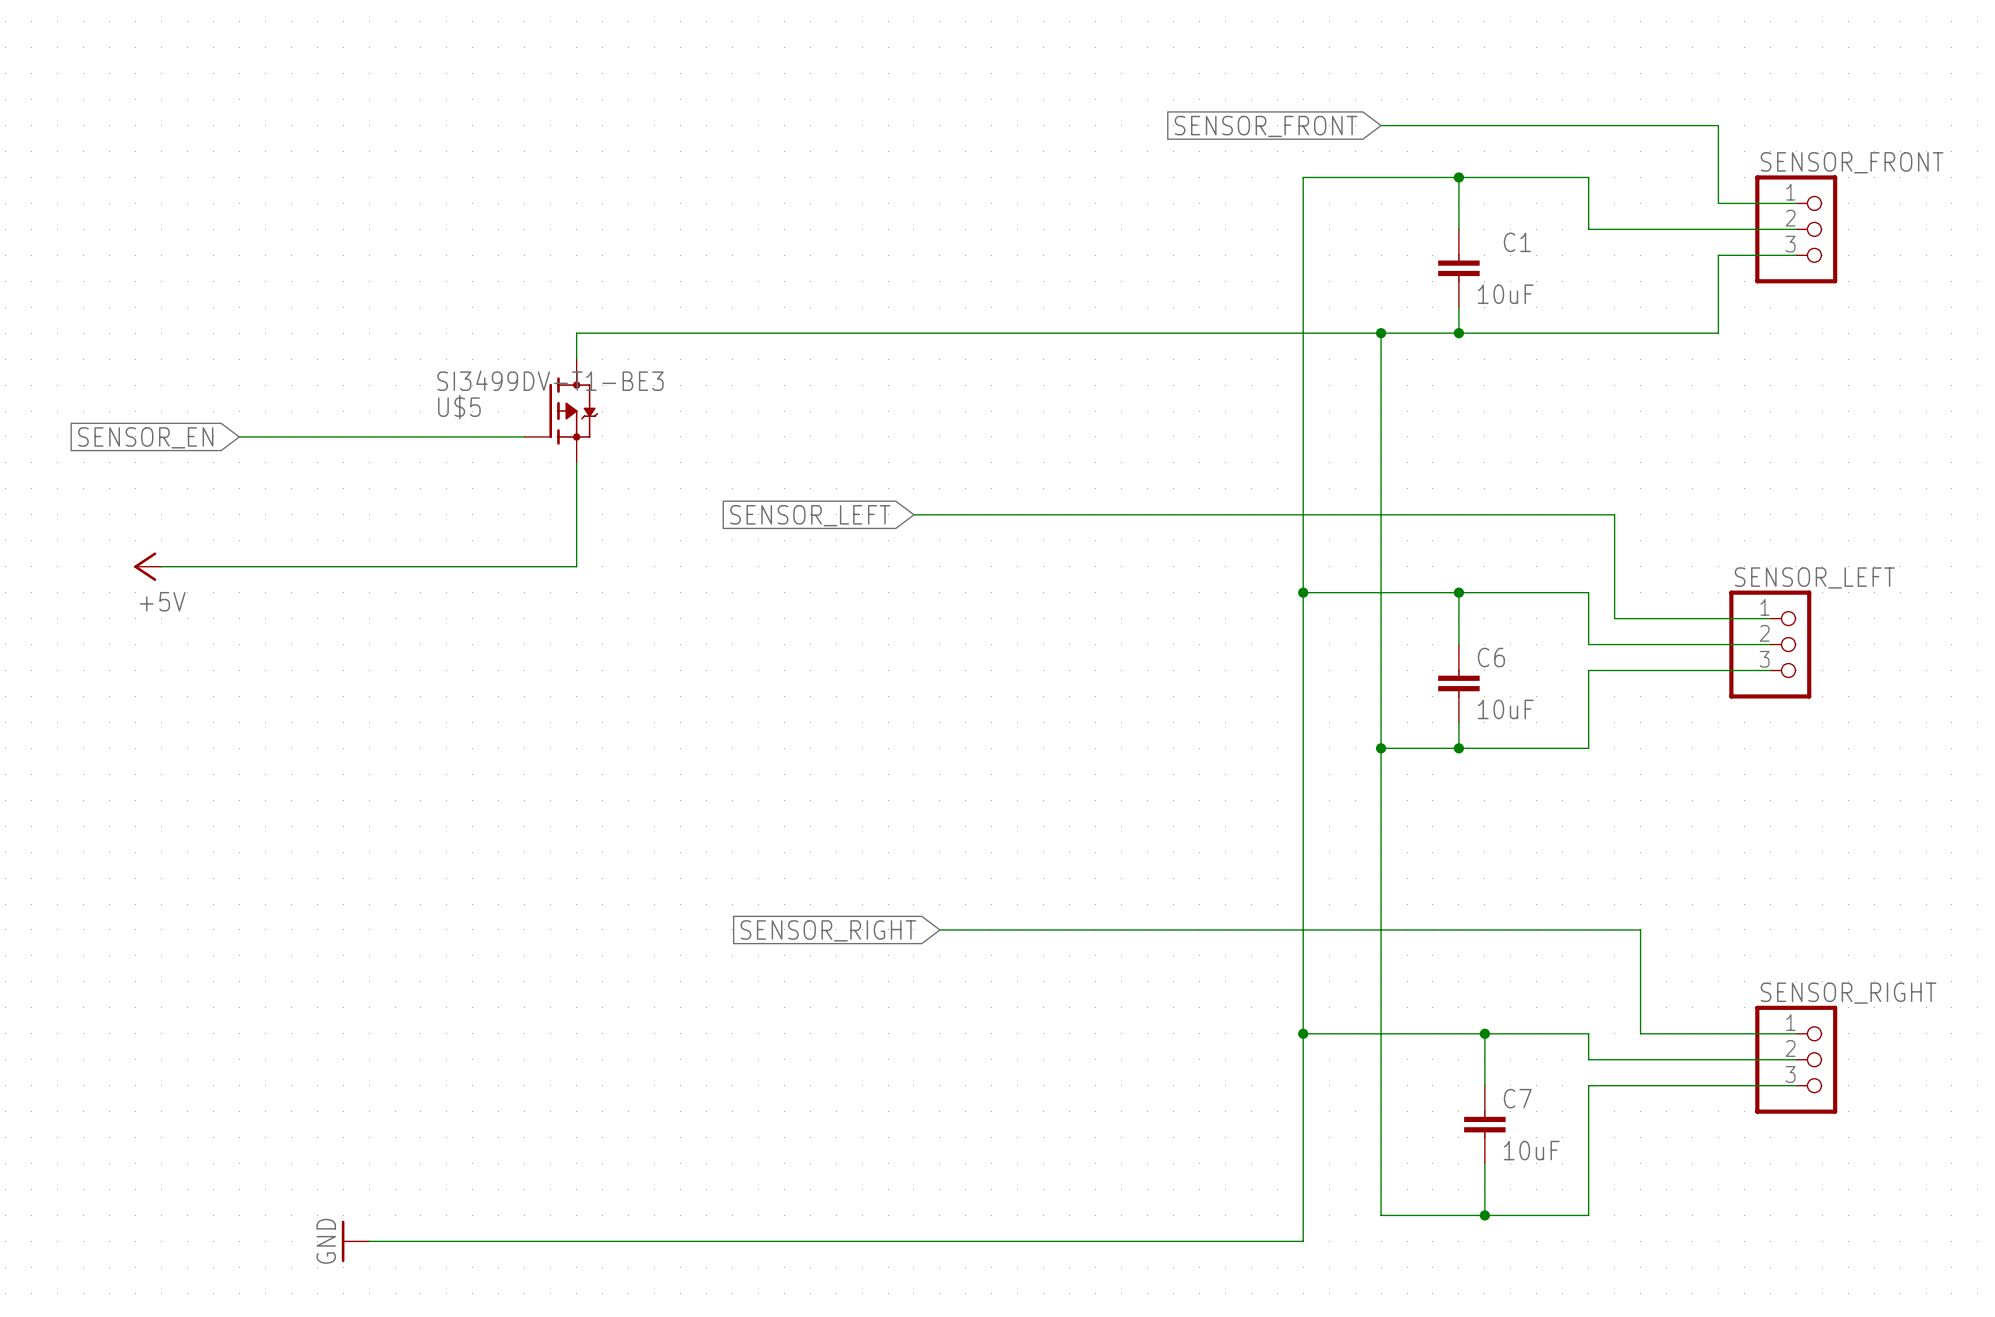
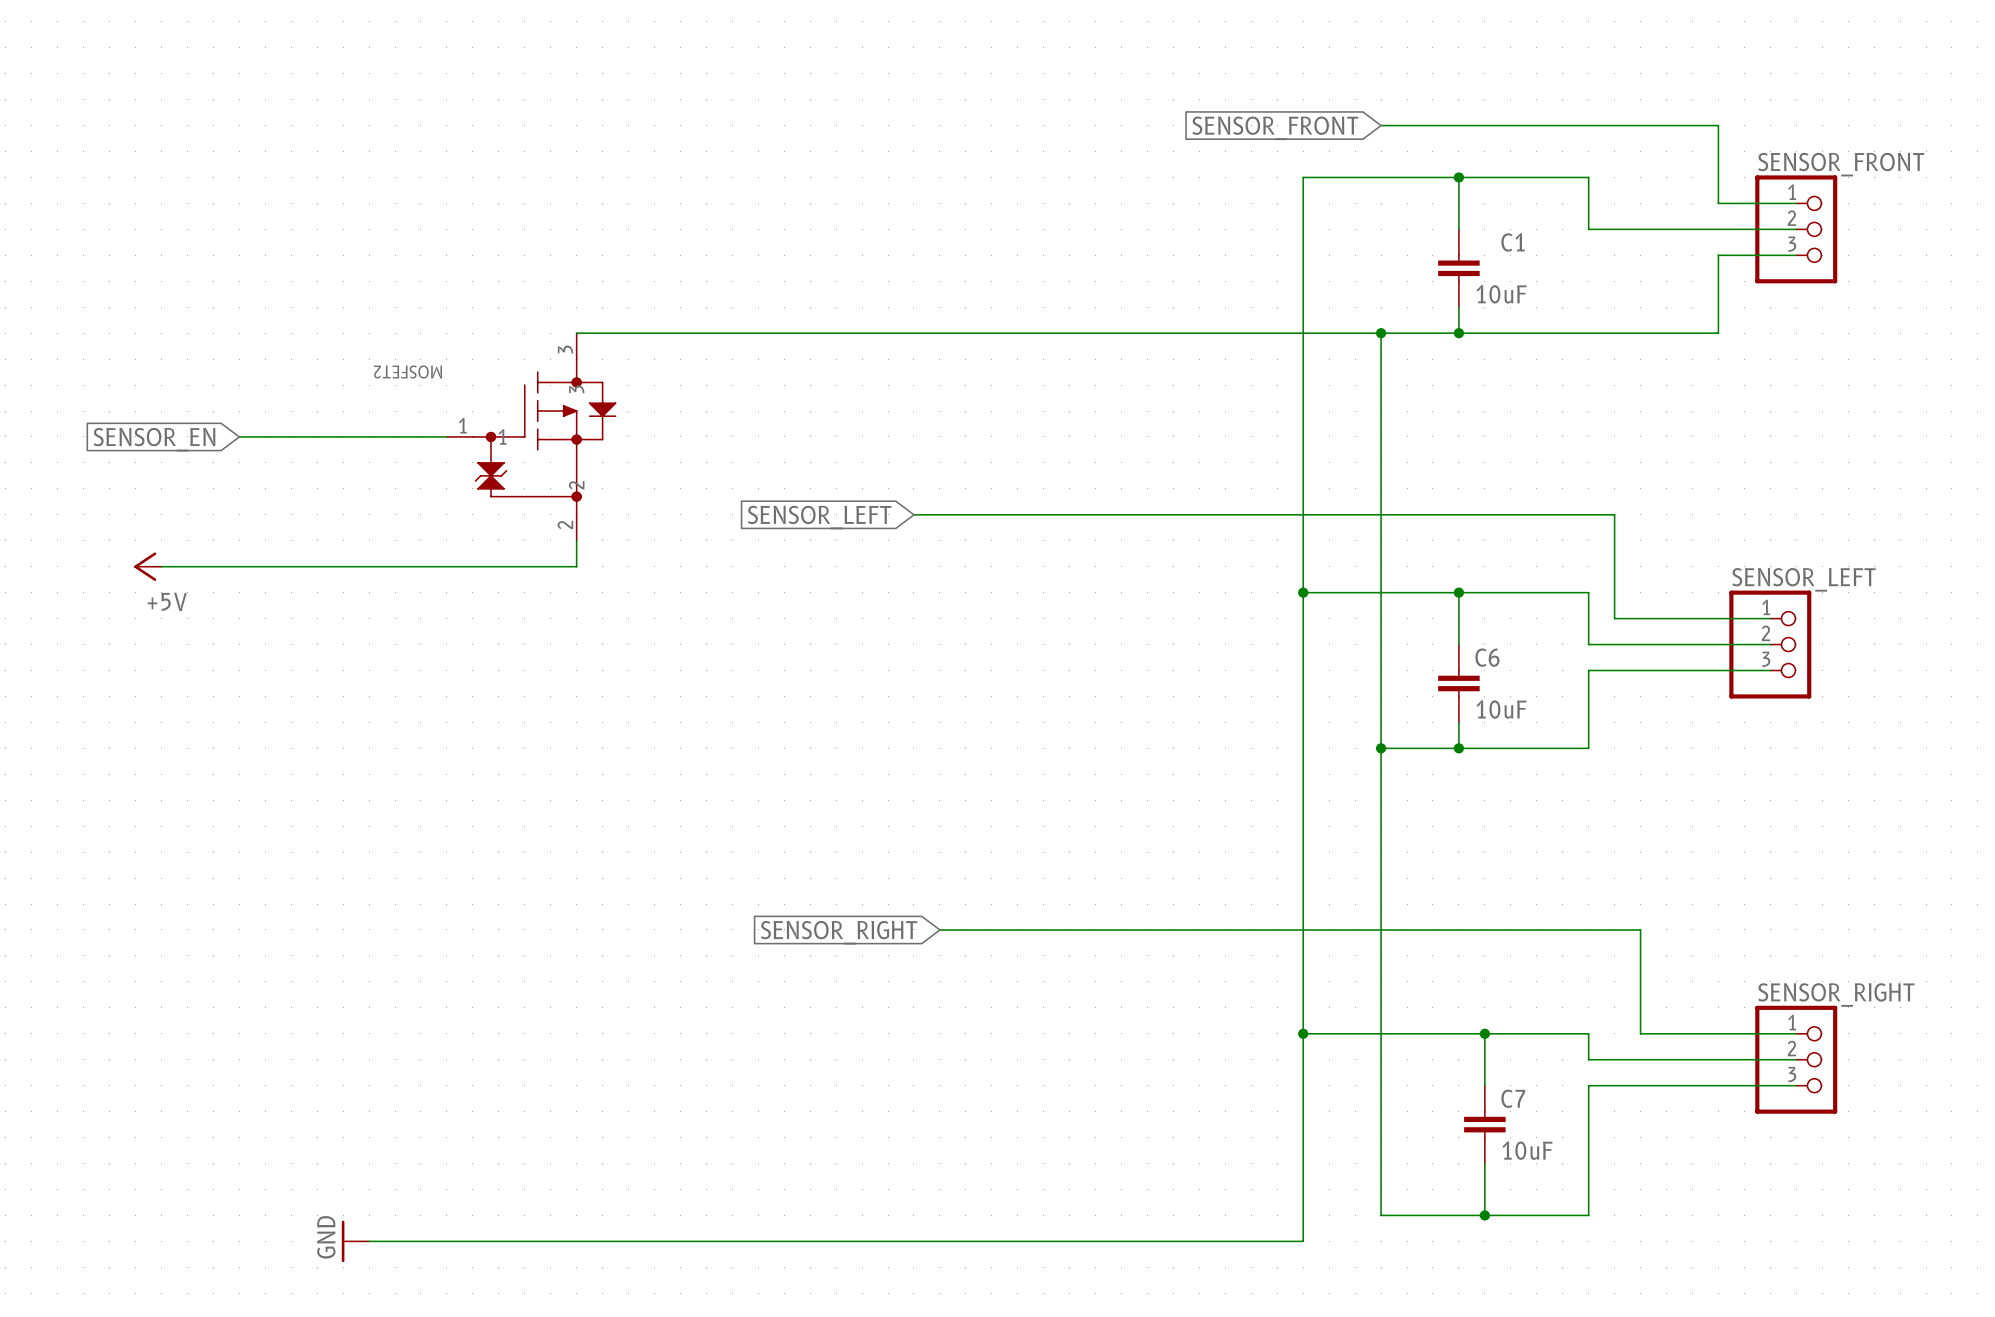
U$5: SI3499DV-T1-BE3 (561, 411) -> none
MOSFET2: none -> (531, 436)

